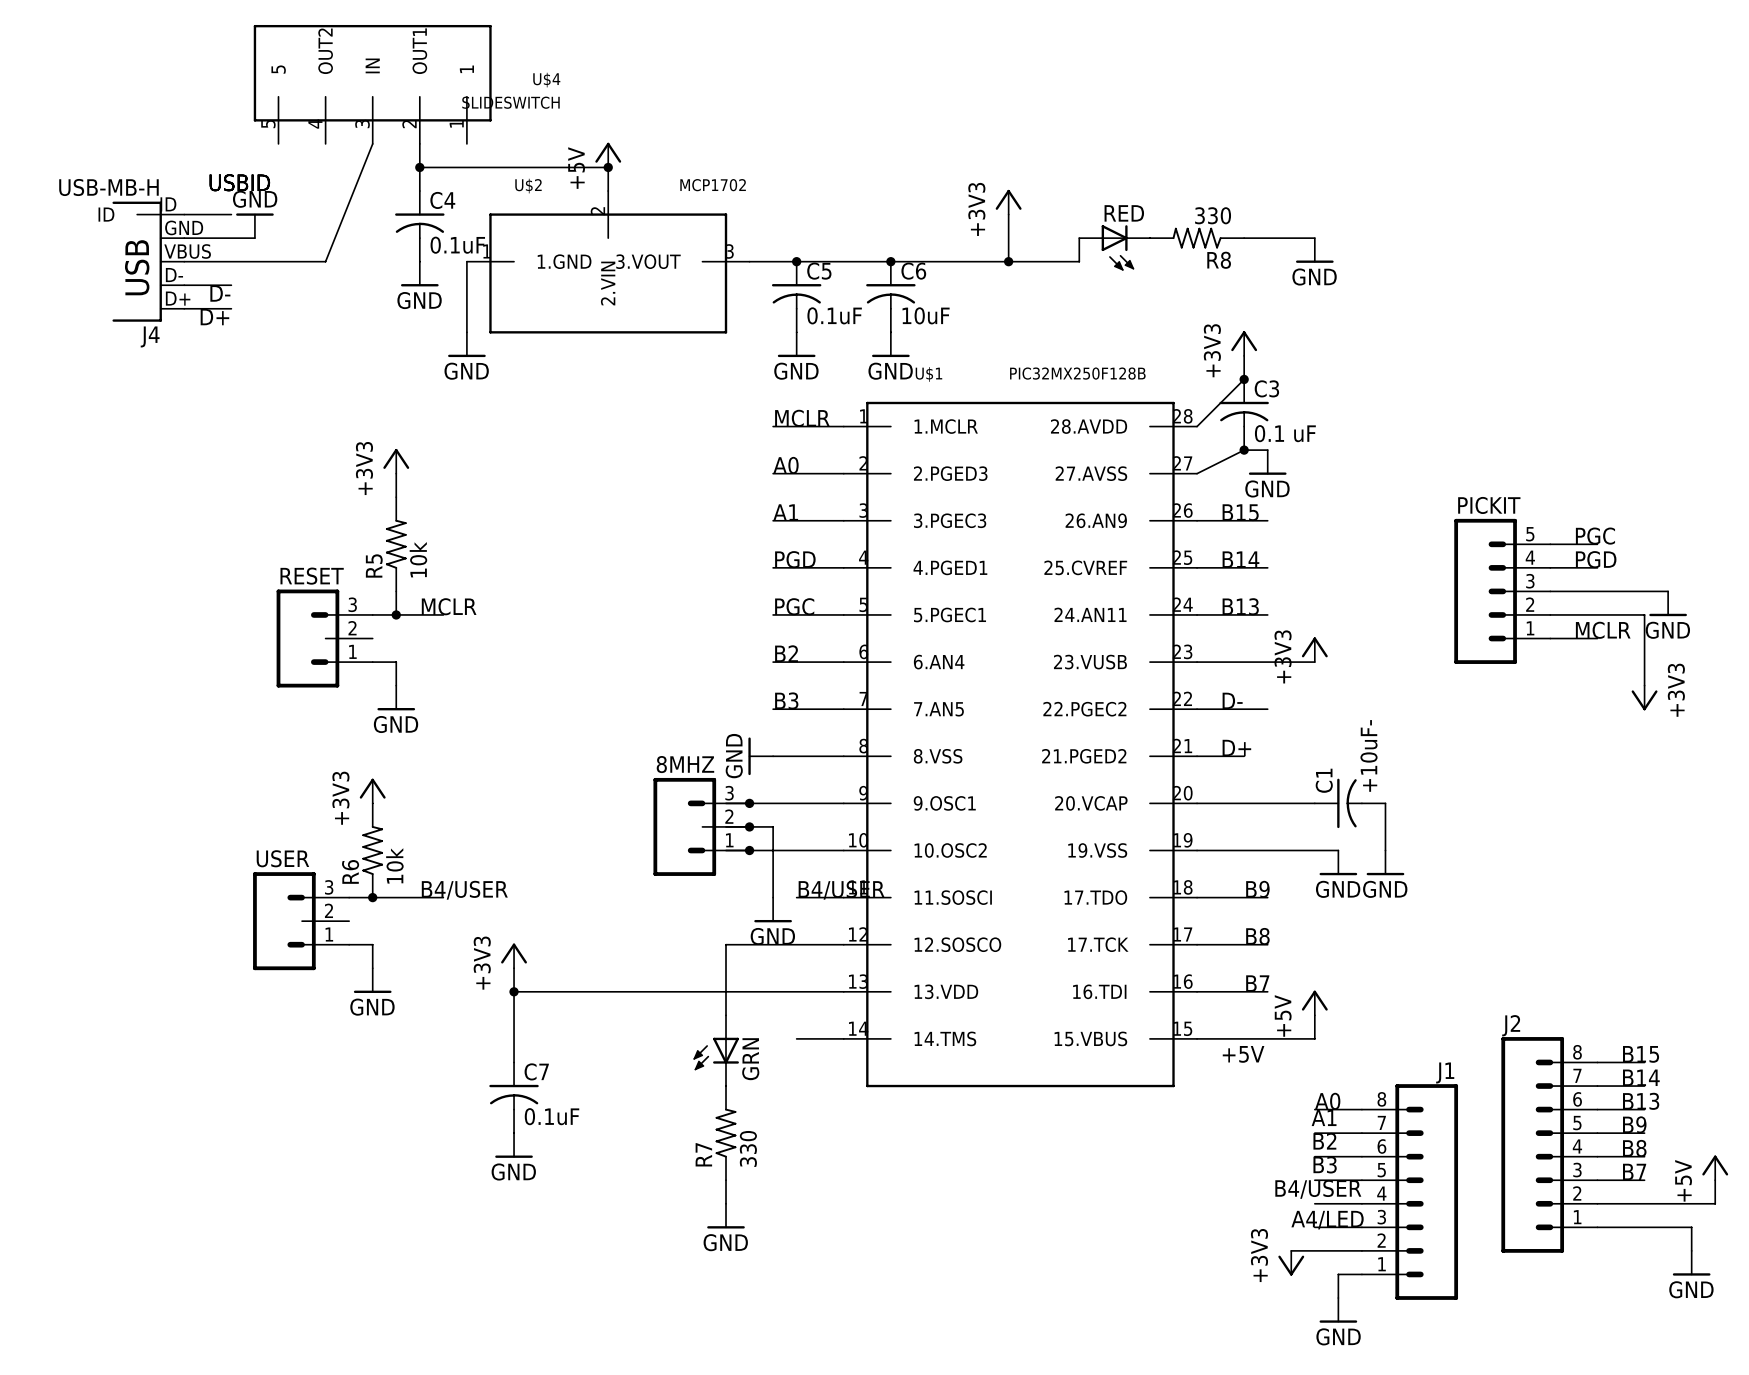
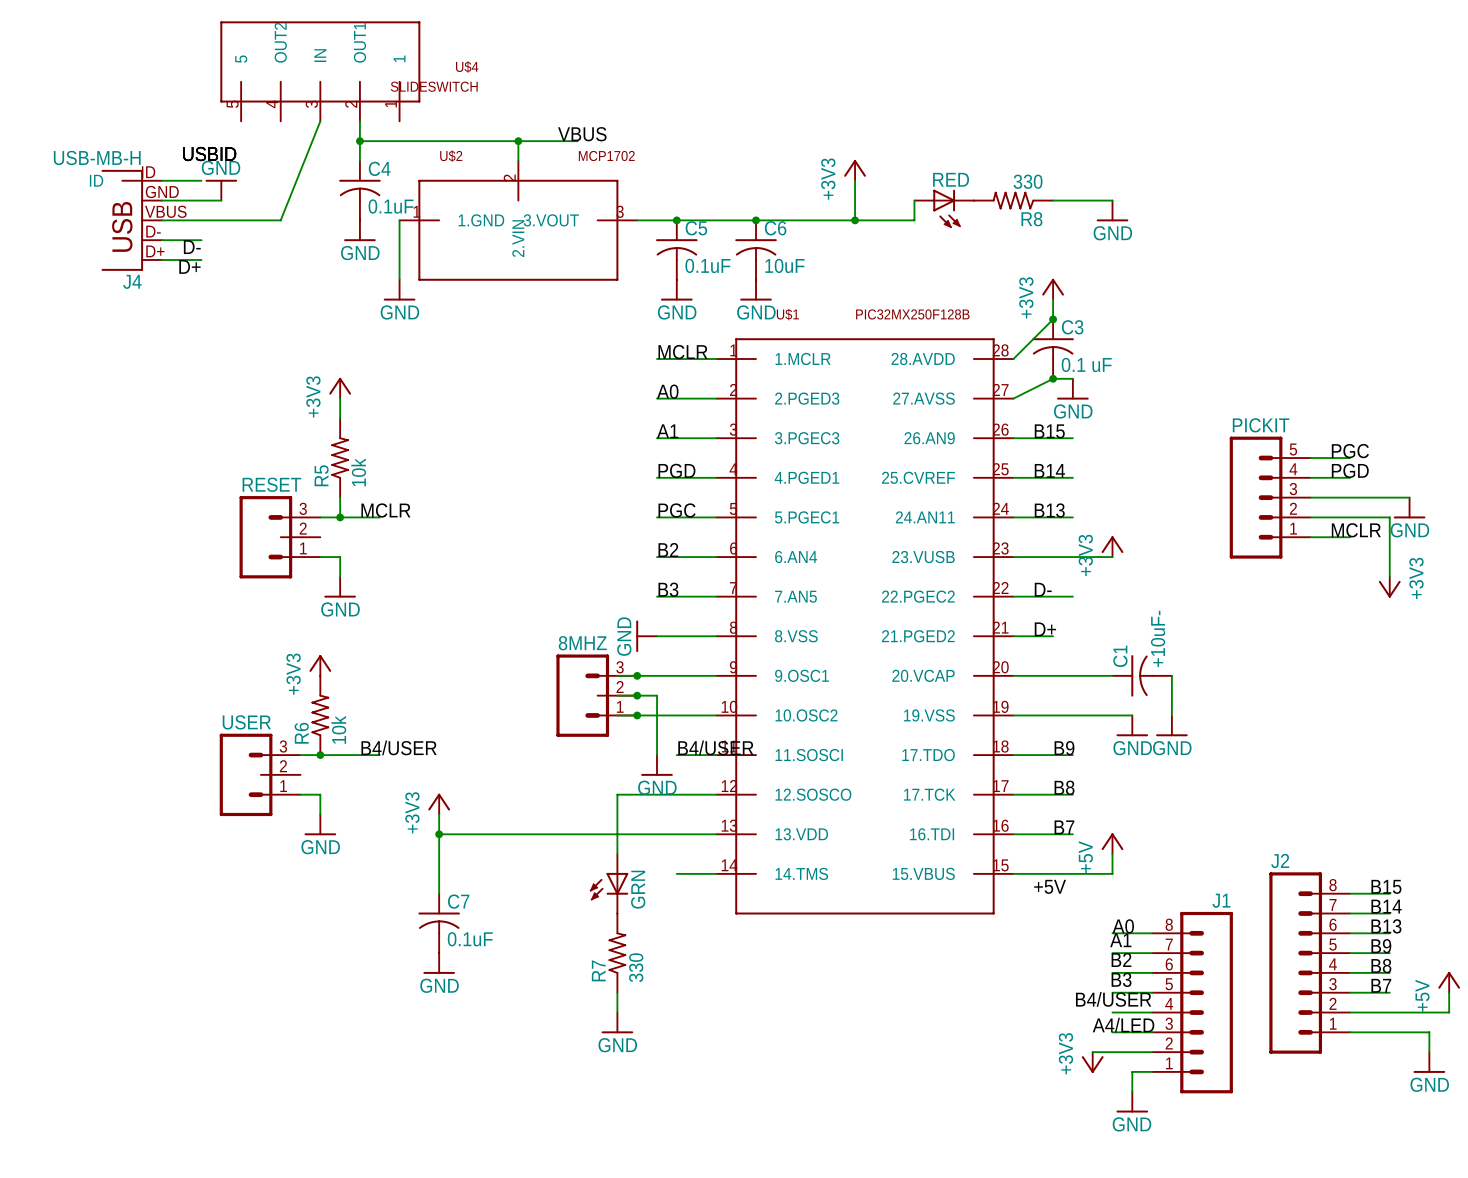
power symbol: +5V (608, 155) -> none
label: none -> VBUS (582, 134)
wire: none -> (518, 141) (577, 141)

